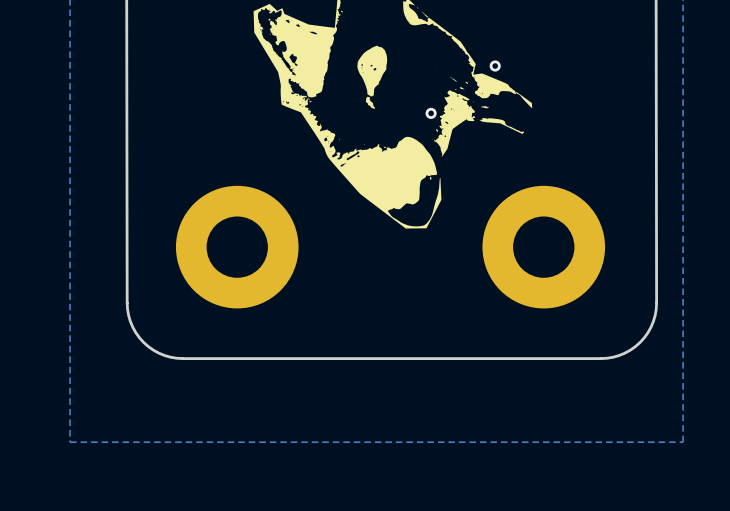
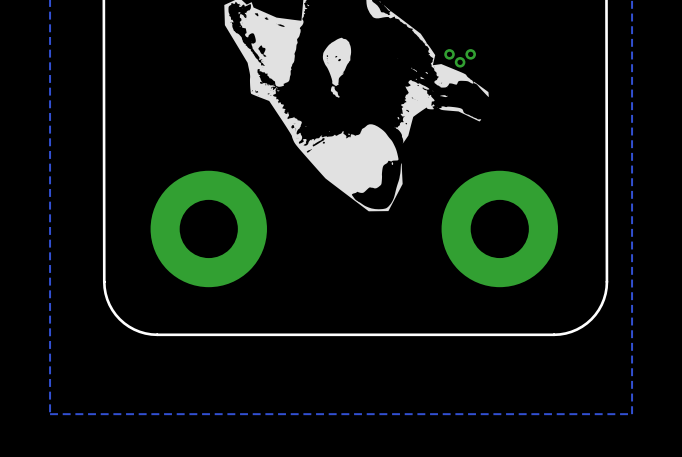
via: none -> (449, 54)
via: none -> (470, 54)
via: (495, 66) -> none
via: none -> (460, 62)
via: (431, 113) -> none

